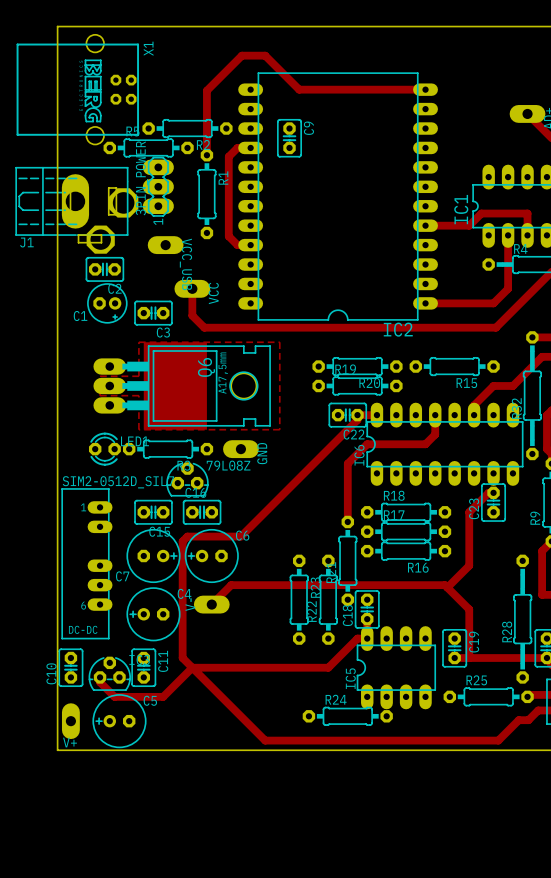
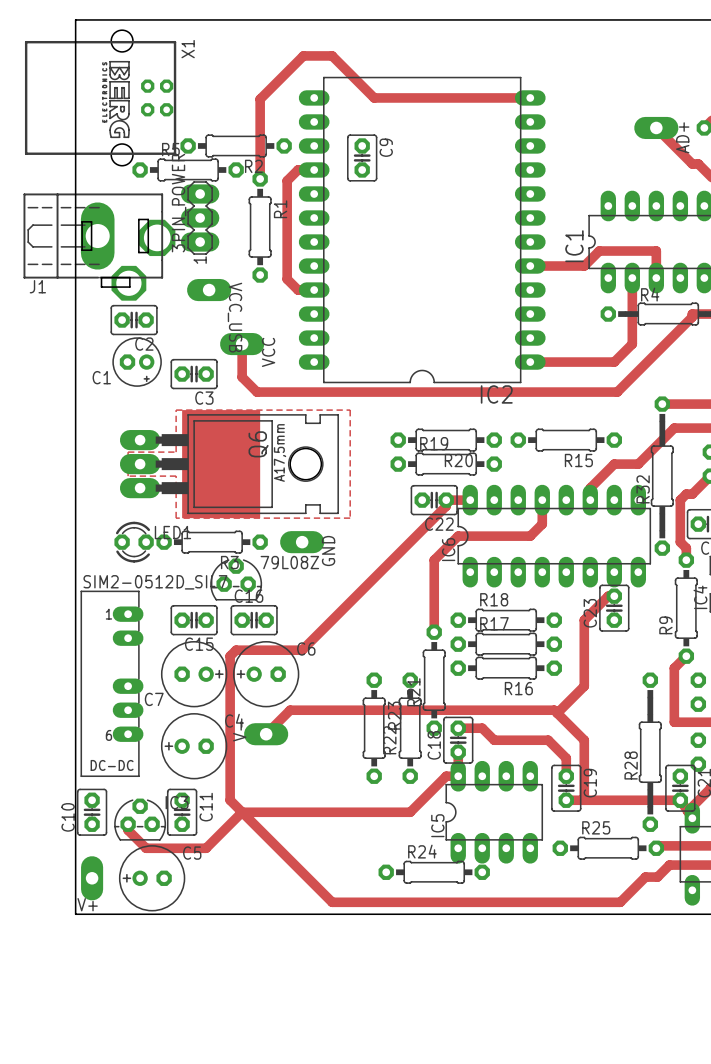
track: none -> (458, 728) (482, 728) (494, 740) (548, 740) (566, 758) (566, 776)

